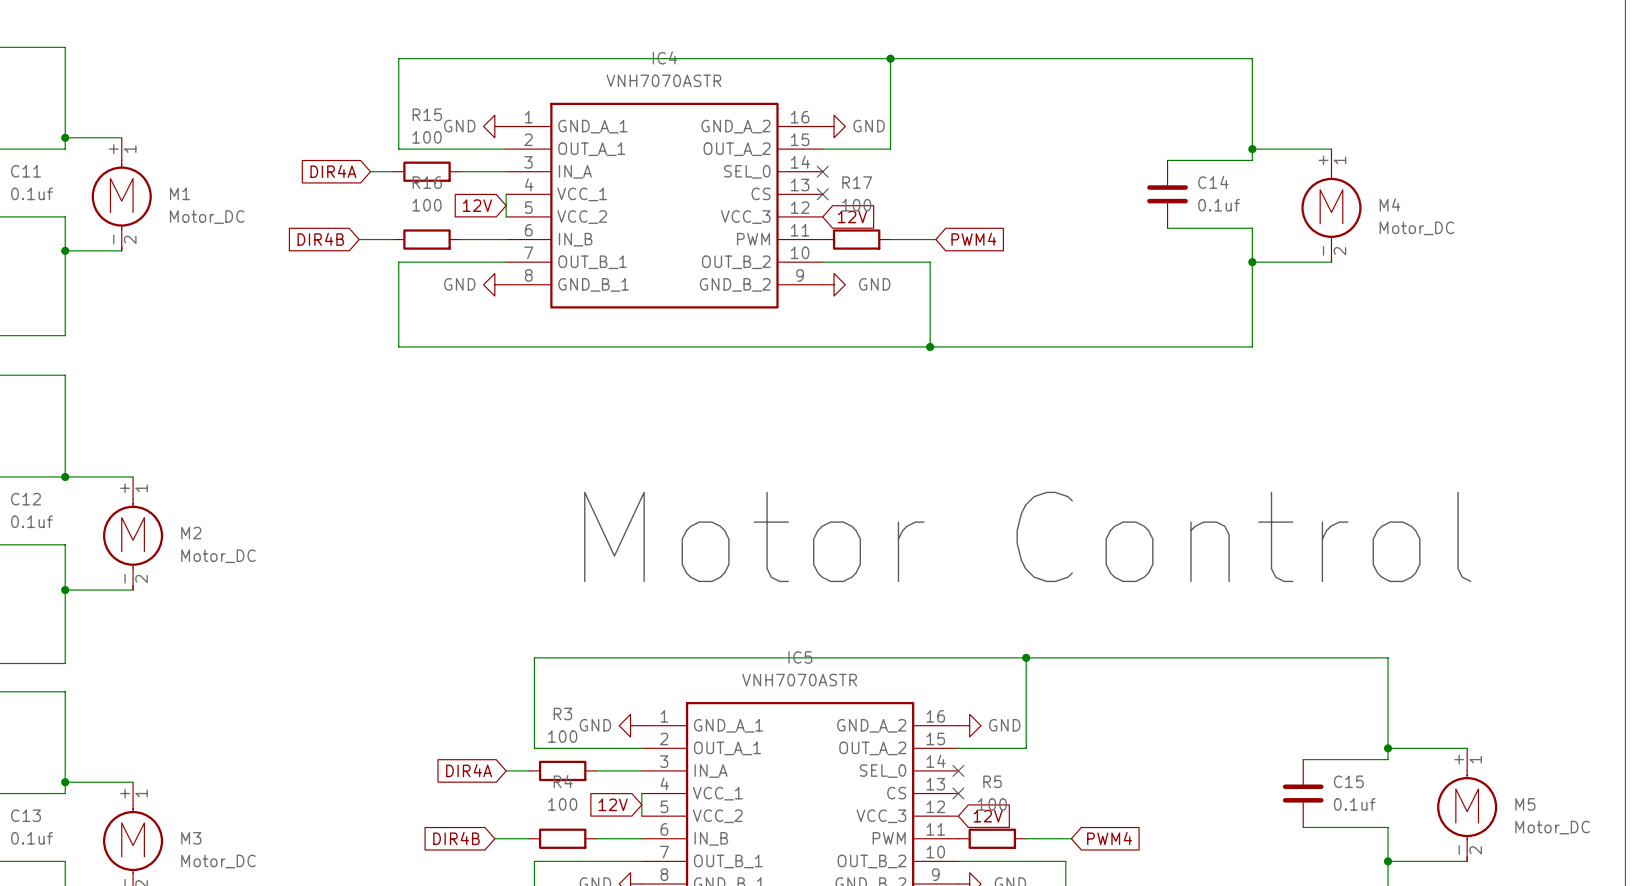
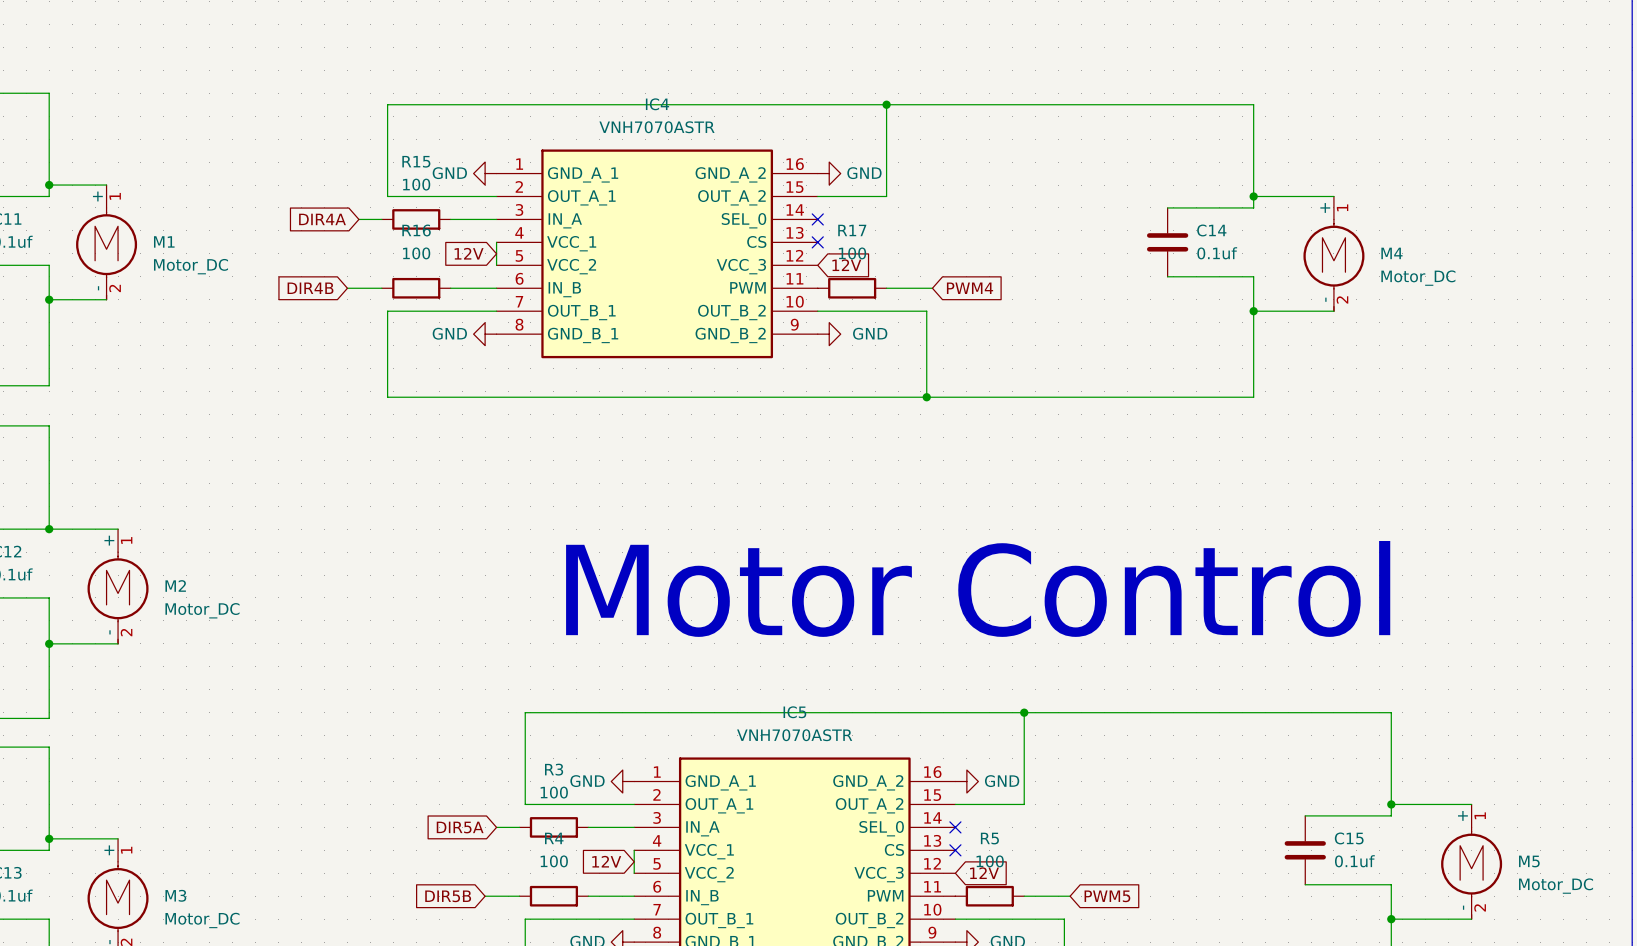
global label: DIR4A (469, 770) -> DIR5A (460, 827)
global label: DIR4B (456, 838) -> DIR5B (448, 896)
global label: PWM4 (1109, 838) -> PWM5 (1107, 896)

